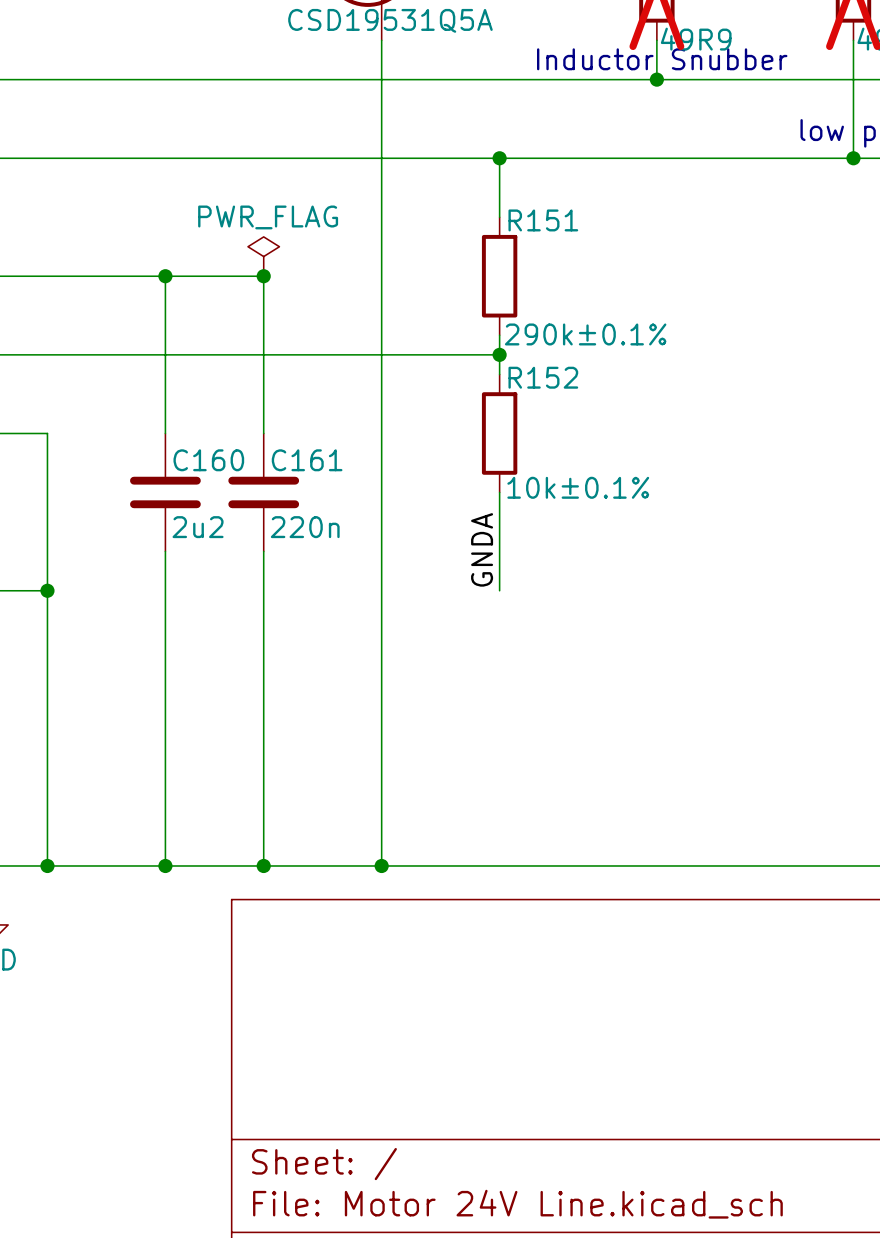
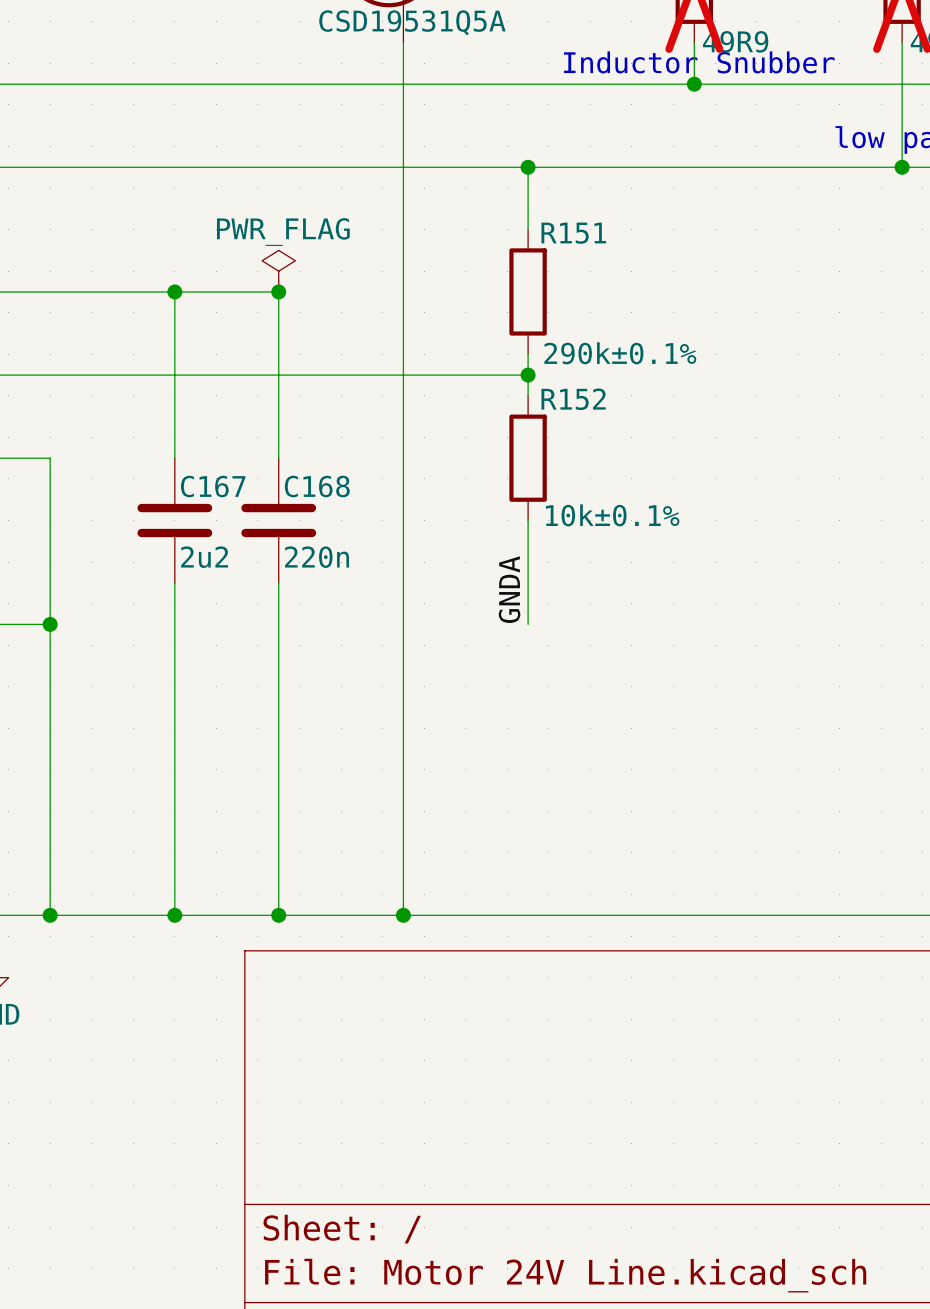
C160 name: C160 (208, 460) -> C167 (213, 486)
C161 name: C161 (307, 460) -> C168 (317, 486)

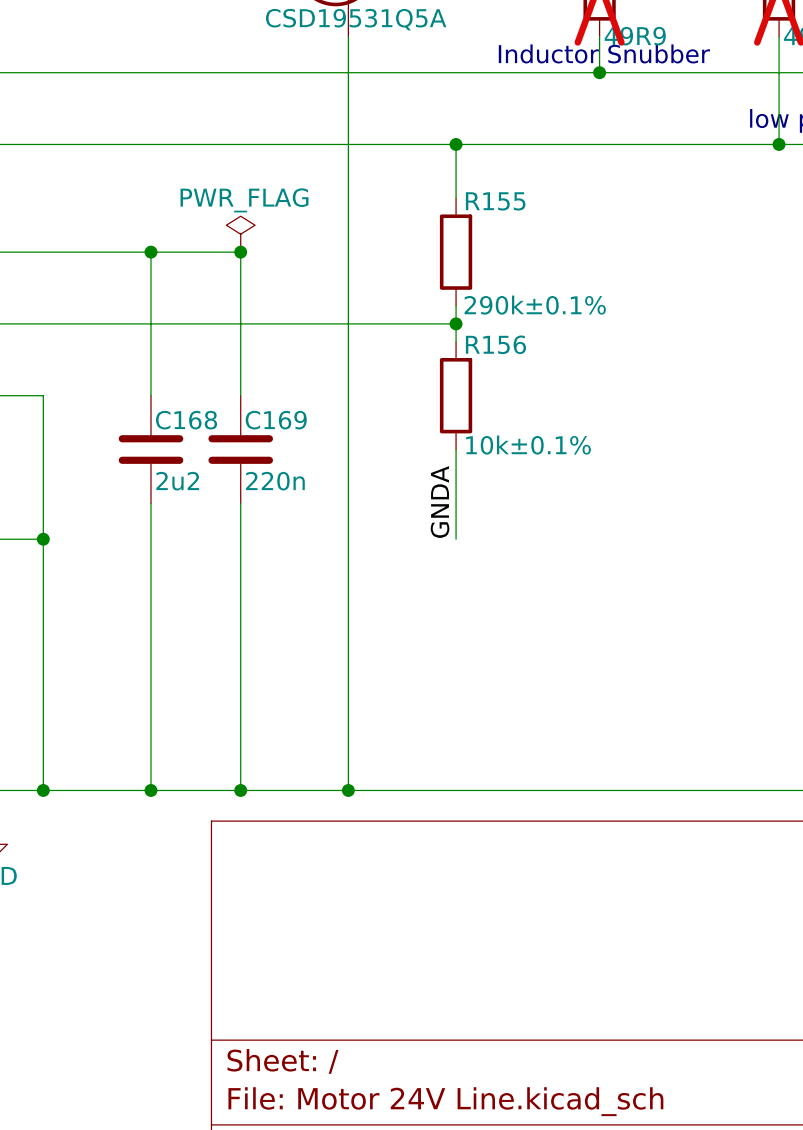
R151 name: R151 (573, 233) -> R155 (495, 201)
R152 name: R152 (573, 399) -> R156 (495, 344)
C167 name: C167 (213, 486) -> C168 (186, 420)
C168 name: C168 (317, 486) -> C169 (276, 420)

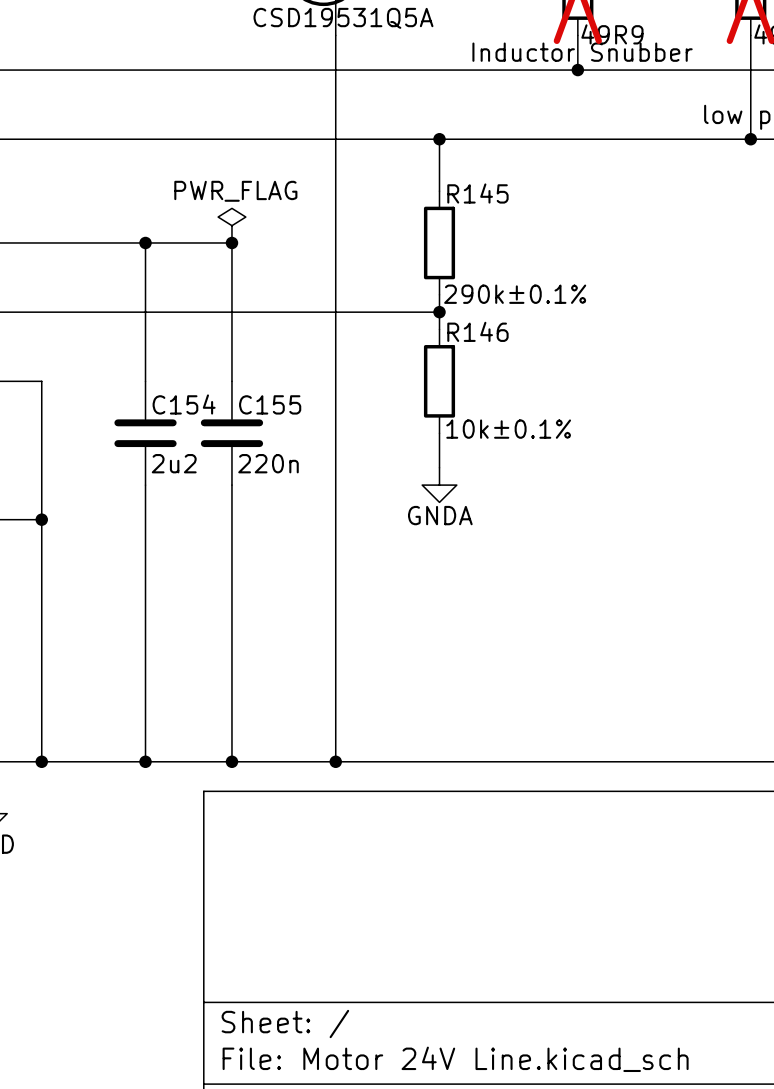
R155 name: R155 (495, 201) -> R145 (477, 193)
R156 name: R156 (495, 344) -> R146 (477, 331)
C168 name: C168 (186, 420) -> C154 (184, 404)
C169 name: C169 (276, 420) -> C155 (270, 404)
wire: (456, 485) (456, 539) -> none
label: GNDA (440, 502) -> none
power symbol: none -> GNDA (439, 485)

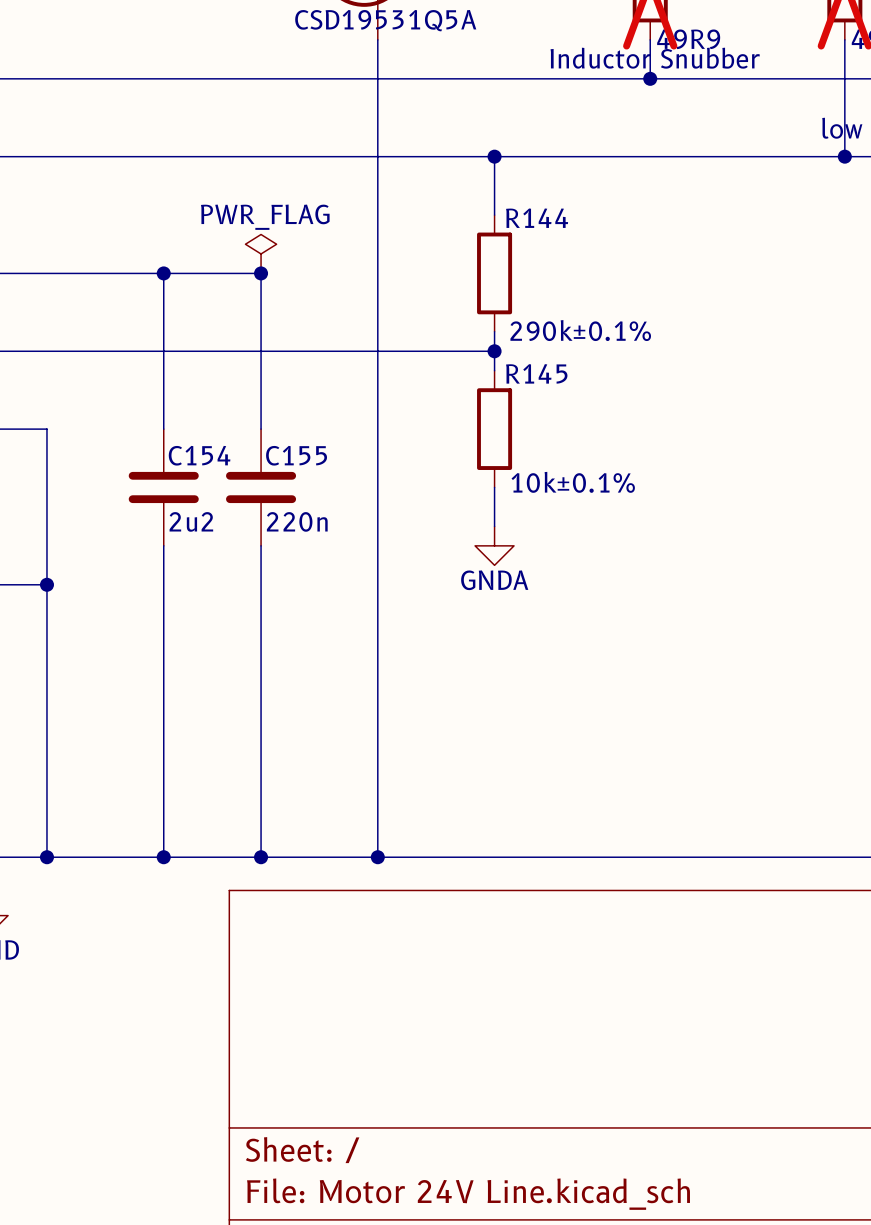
R145 name: R145 (477, 193) -> R144 (537, 218)
R146 name: R146 (477, 331) -> R145 (536, 373)

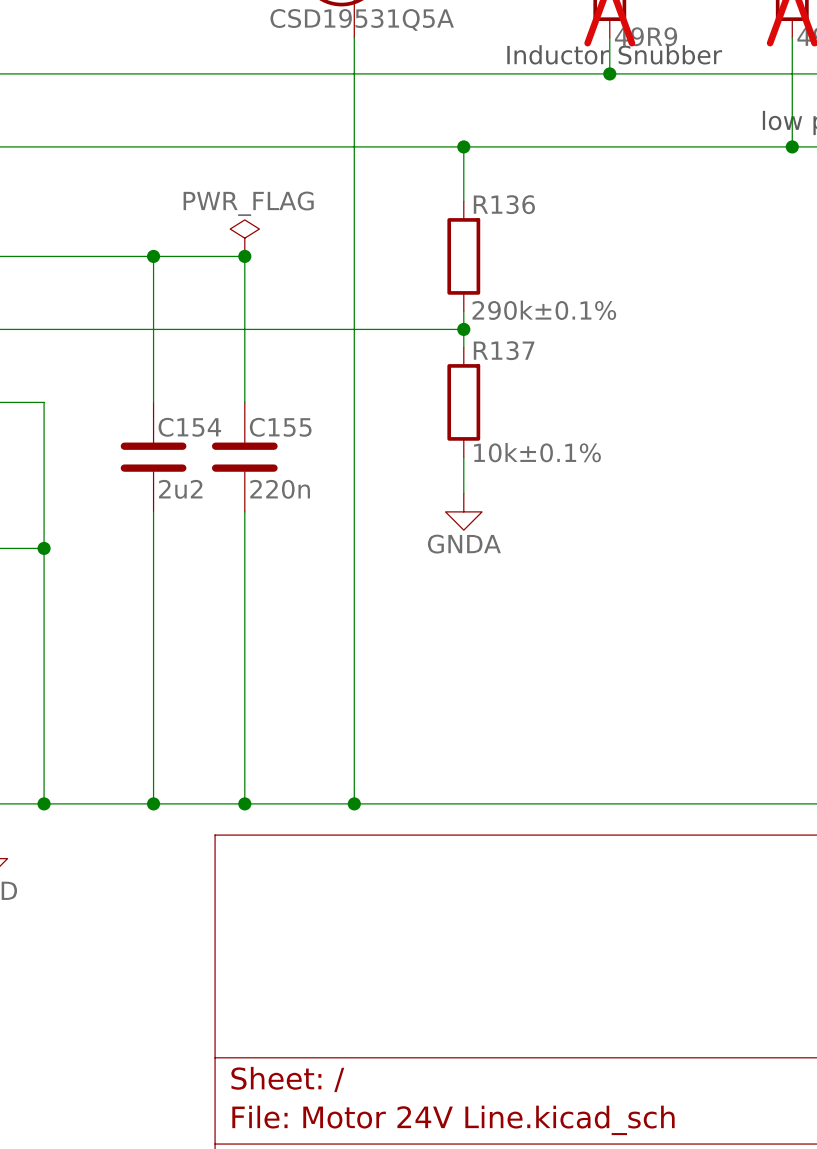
R144 name: R144 (537, 218) -> R136 (504, 204)
R145 name: R145 (536, 373) -> R137 (504, 350)

